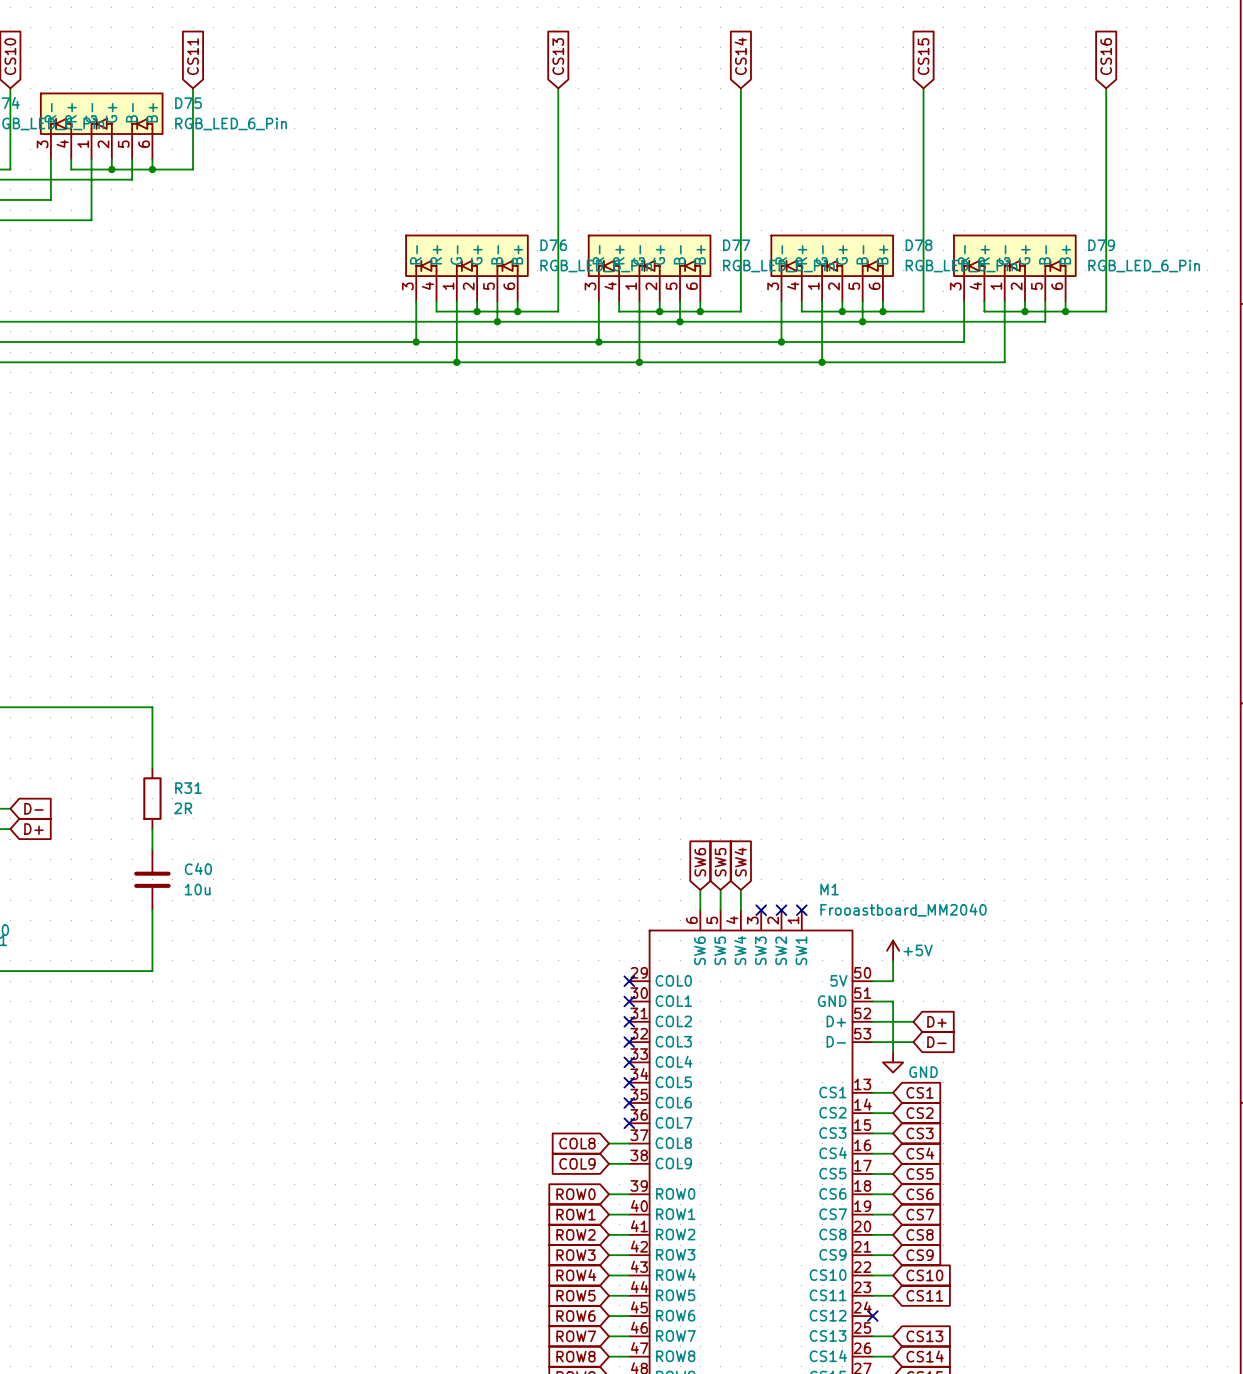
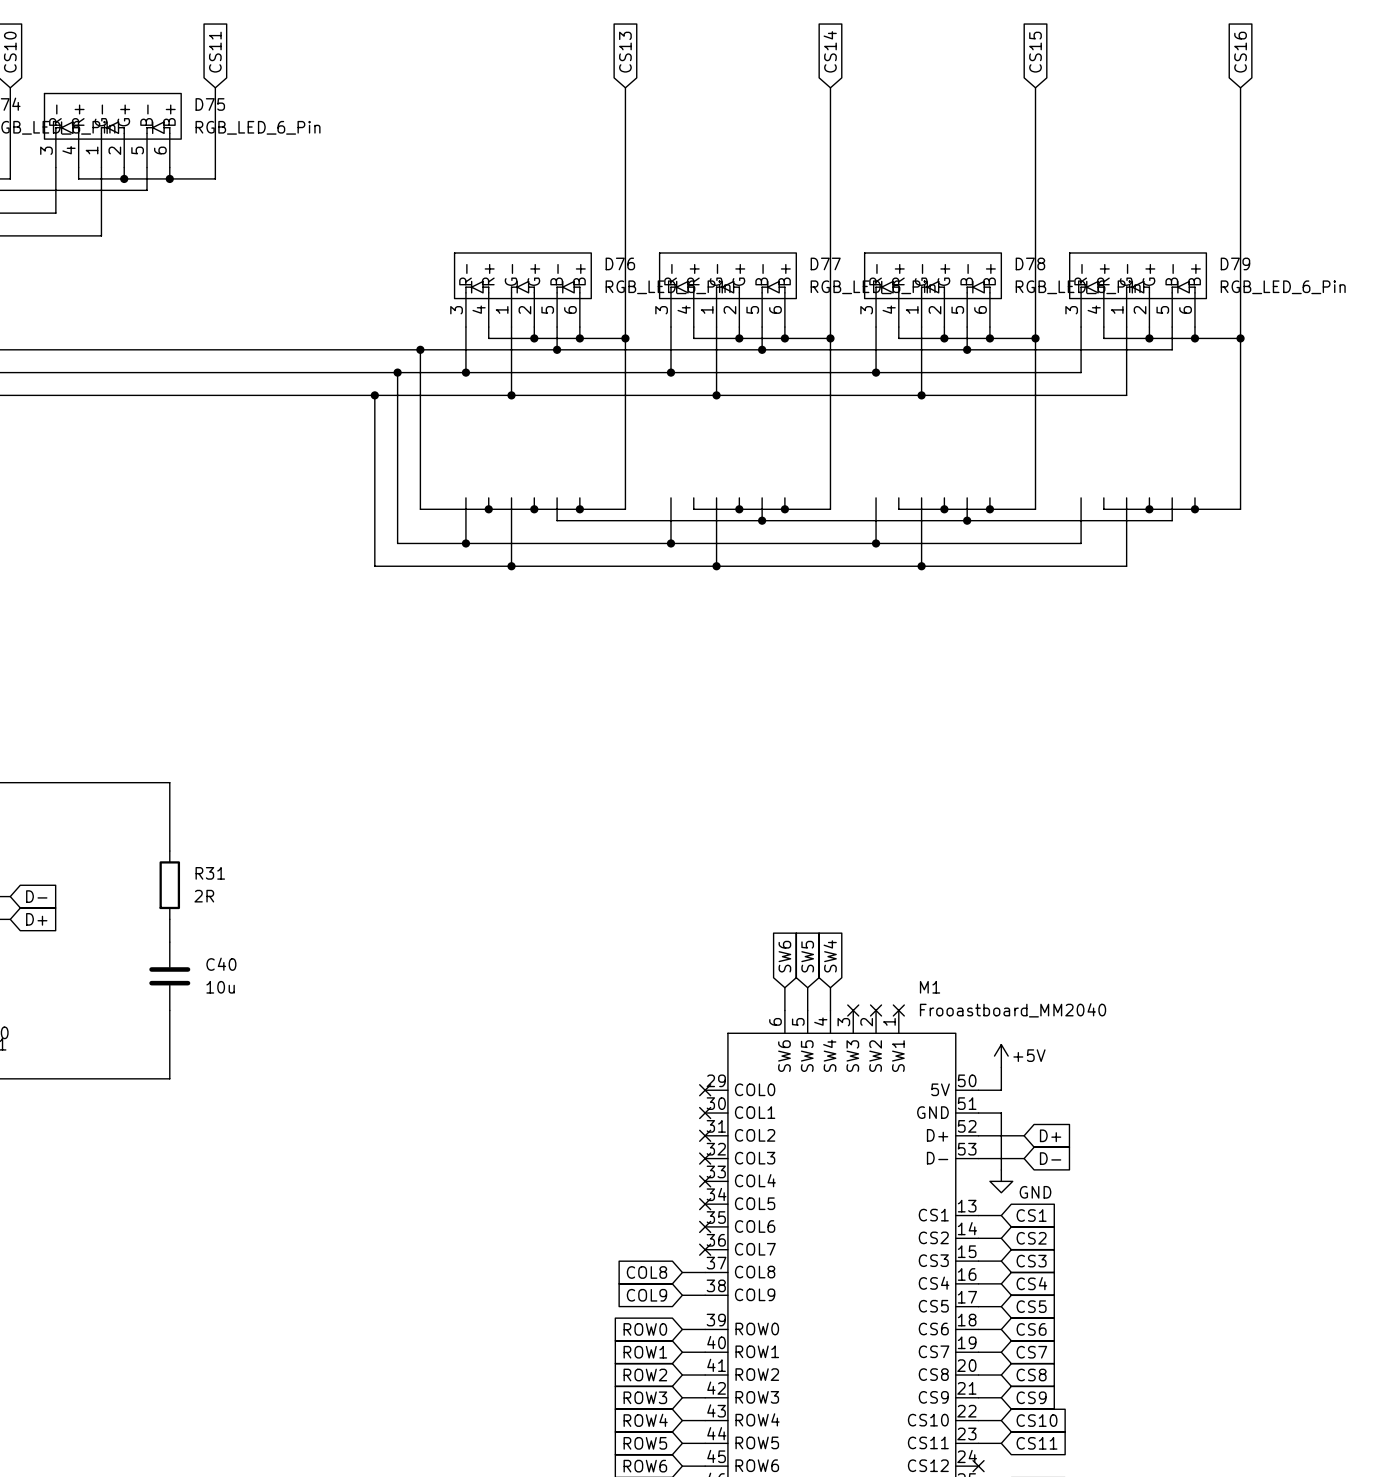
wire: none -> (625, 338) (625, 509) (420, 509) (420, 349)
junction: none -> (625, 338)
wire: none -> (830, 338) (830, 509) (693, 509) (693, 497)
junction: none -> (830, 338)
wire: none -> (1035, 338) (1035, 509) (898, 509) (898, 497)
junction: none -> (1035, 338)
wire: none -> (1240, 338) (1240, 509) (1103, 509) (1103, 497)
junction: none -> (1240, 338)
junction: none -> (420, 349)
wire: none -> (397, 372) (397, 543) (1081, 543) (1081, 497)
junction: none -> (397, 372)
wire: none -> (374, 395) (374, 566) (1126, 566) (1126, 497)
junction: none -> (374, 395)
wire: none -> (465, 497) (465, 543)
wire: none -> (488, 497) (488, 509)
wire: none -> (511, 497) (511, 566)
wire: none -> (534, 497) (534, 509)
wire: none -> (557, 497) (557, 520) (1172, 520) (1172, 497)
wire: none -> (579, 497) (579, 509)
wire: none -> (670, 497) (670, 543)
wire: none -> (716, 497) (716, 566)
wire: none -> (739, 497) (739, 509)
wire: none -> (762, 497) (762, 520)
wire: none -> (784, 497) (784, 509)
wire: none -> (876, 497) (876, 543)
wire: none -> (921, 497) (921, 566)
wire: none -> (944, 497) (944, 509)
wire: none -> (967, 497) (967, 520)
wire: none -> (989, 497) (989, 509)
wire: none -> (1149, 497) (1149, 509)
wire: none -> (1194, 497) (1194, 509)
junction: none -> (488, 509)
junction: none -> (534, 509)
junction: none -> (579, 509)
junction: none -> (739, 509)
junction: none -> (784, 509)
junction: none -> (944, 509)
junction: none -> (989, 509)
junction: none -> (1149, 509)
junction: none -> (1194, 509)
junction: none -> (762, 520)
junction: none -> (967, 520)
junction: none -> (465, 543)
junction: none -> (670, 543)
junction: none -> (876, 543)
junction: none -> (511, 566)
junction: none -> (716, 566)
junction: none -> (921, 566)

